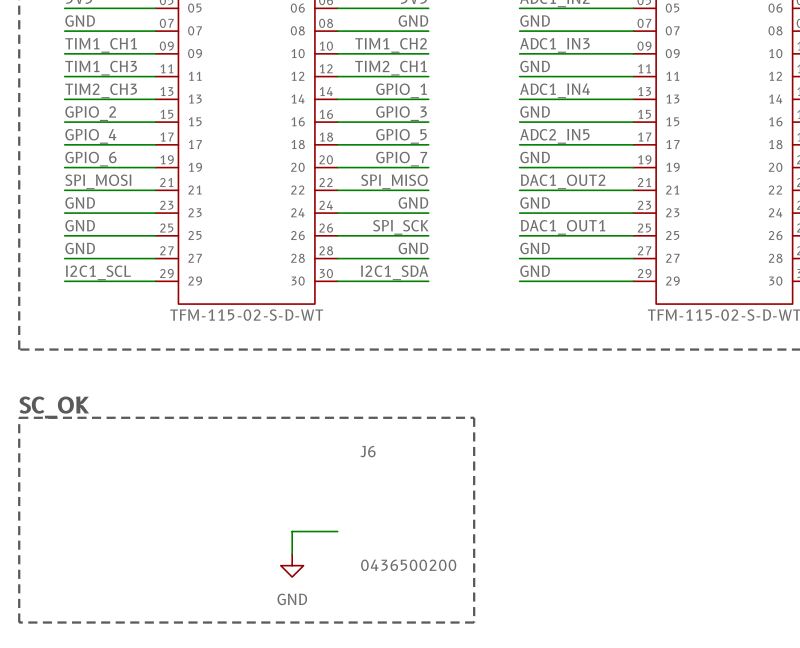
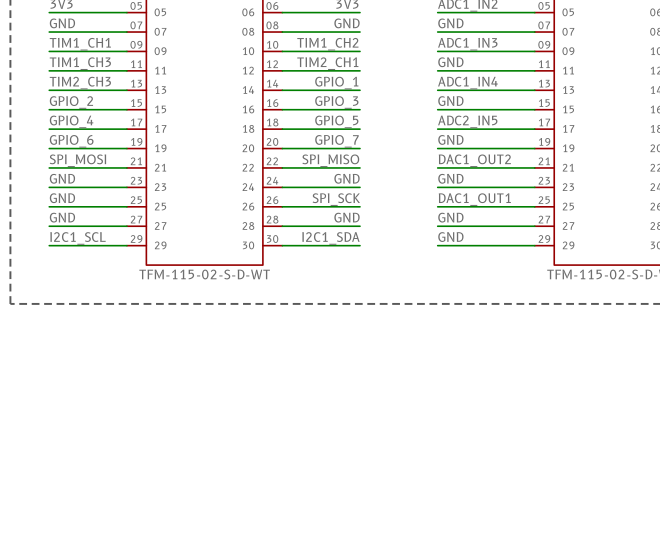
text: SC_OK (54, 407) -> none
line: (19, 417) (474, 417) (474, 622) (19, 622) (19, 417) -> none
J6: 0436500200 (408, 508) -> none
wire: (337, 531) (292, 531) (292, 554) -> none
power symbol: GND (292, 565) -> none

